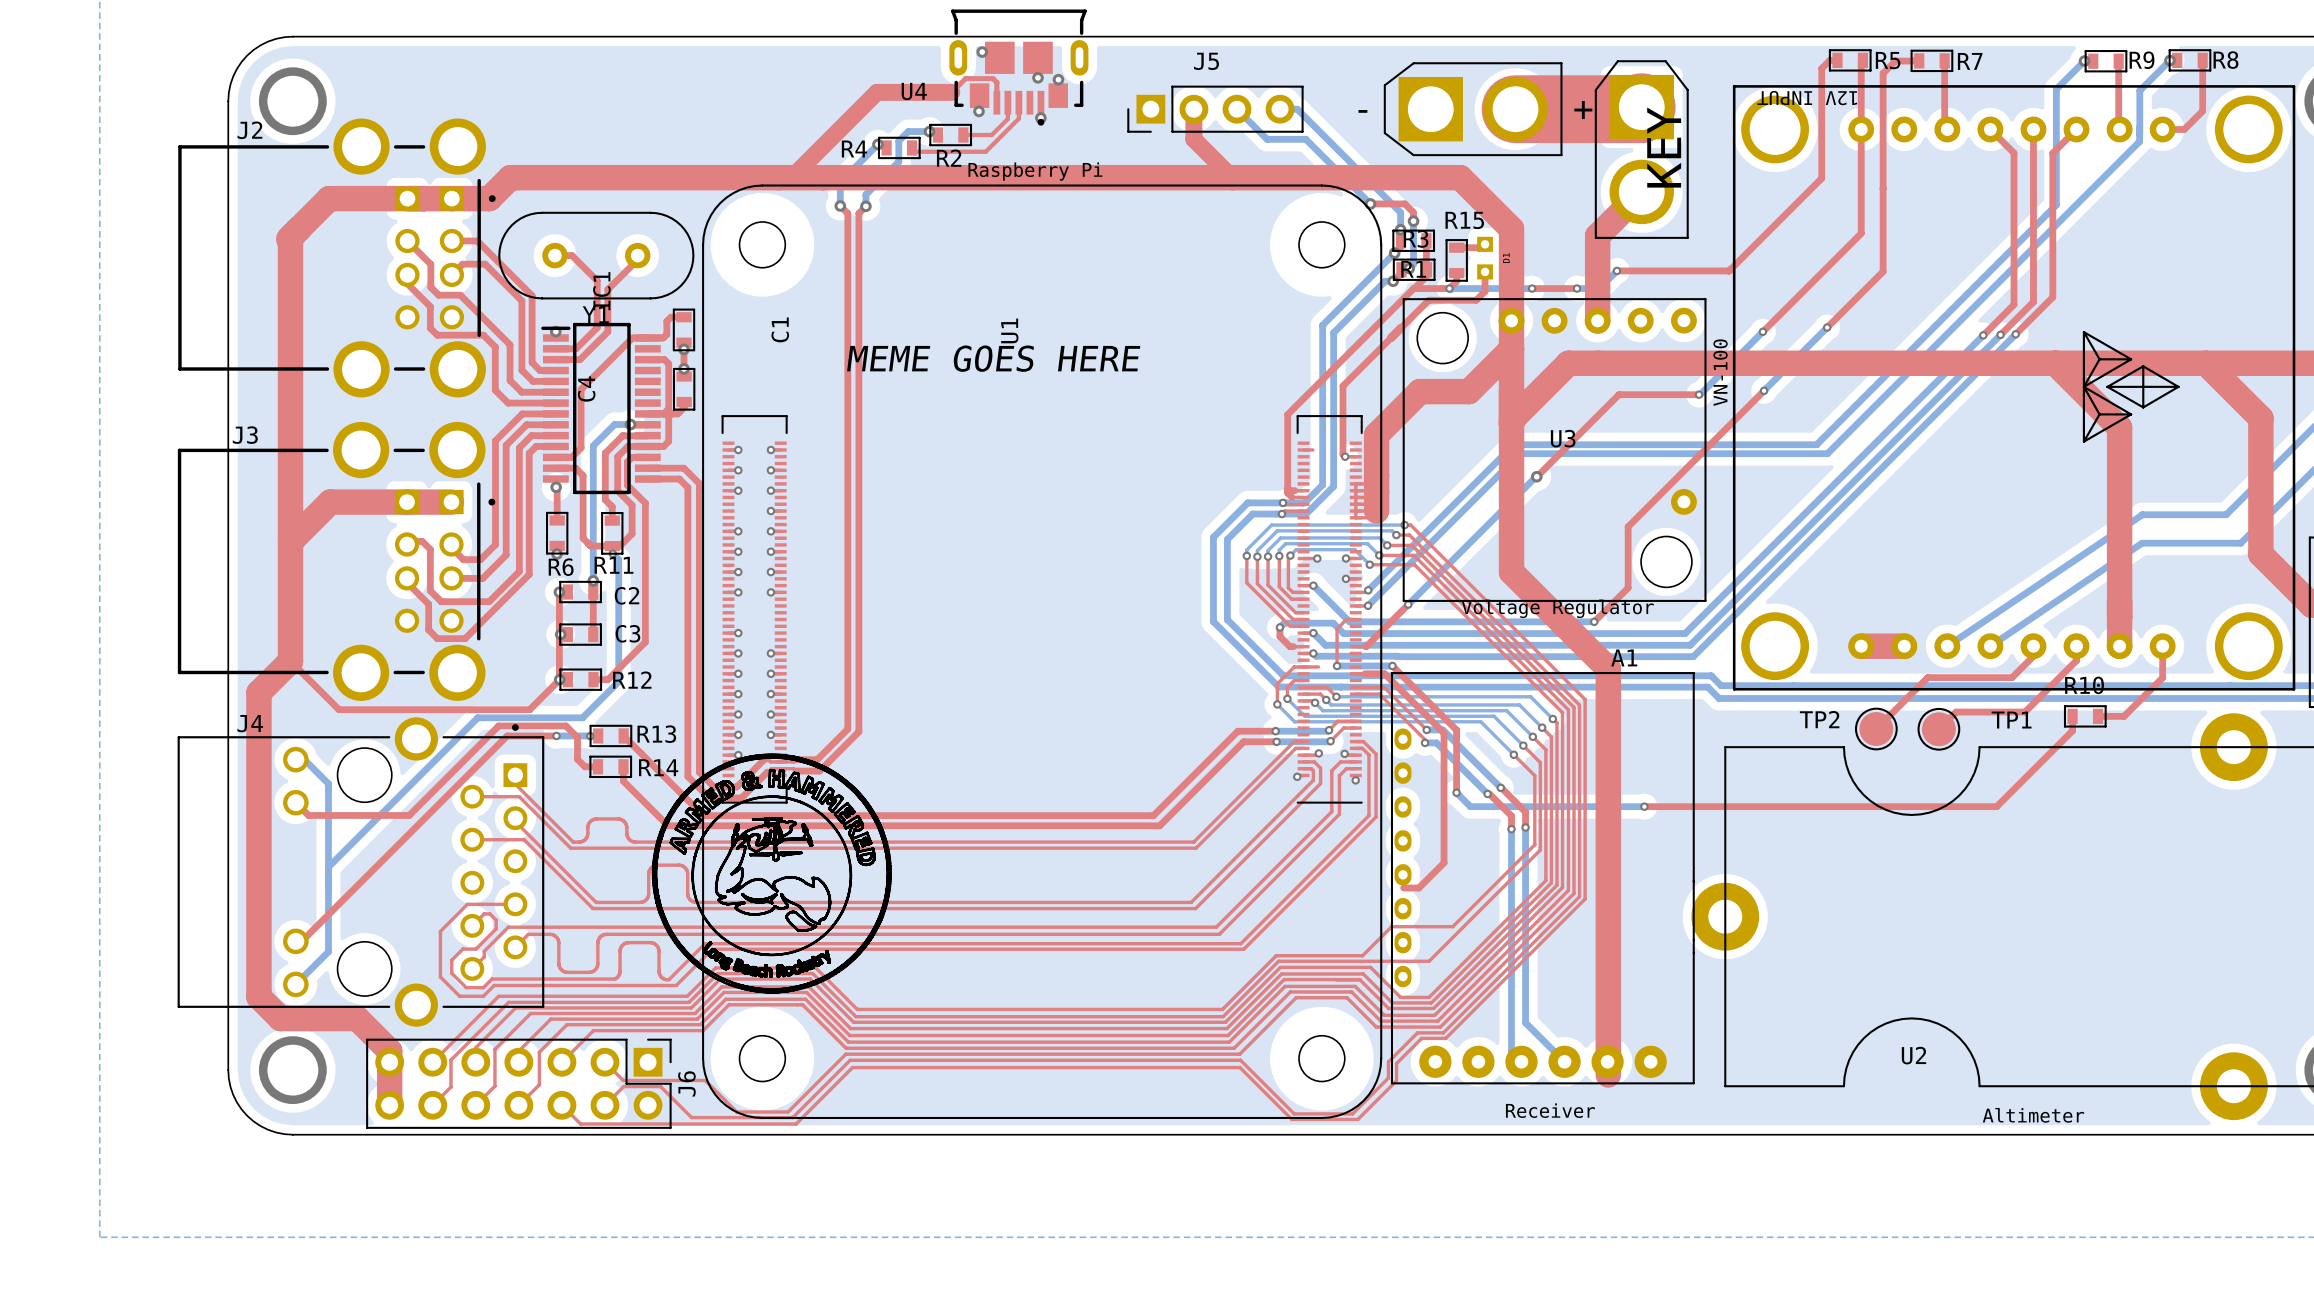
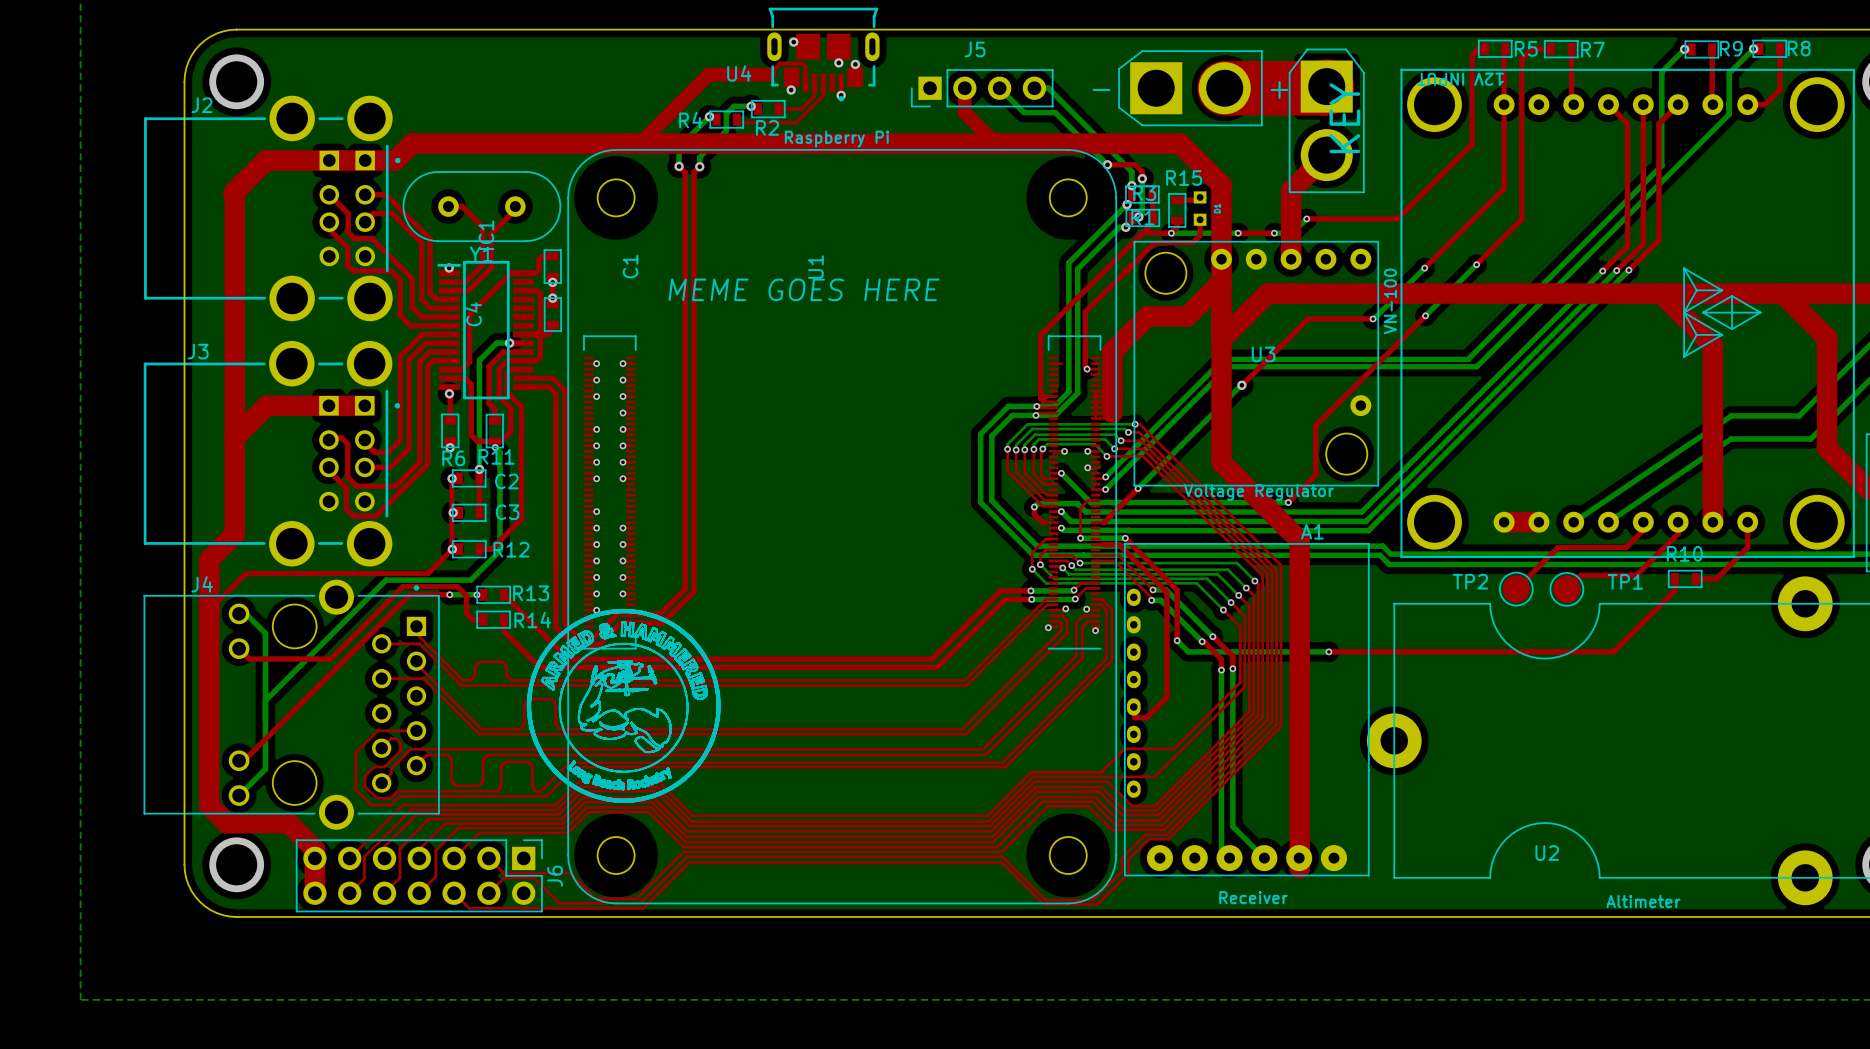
top track: (290, 661) (338, 709) -> (209, 610) (245, 573) (273, 573)
top track: (1303, 667) (1318, 667) -> none

